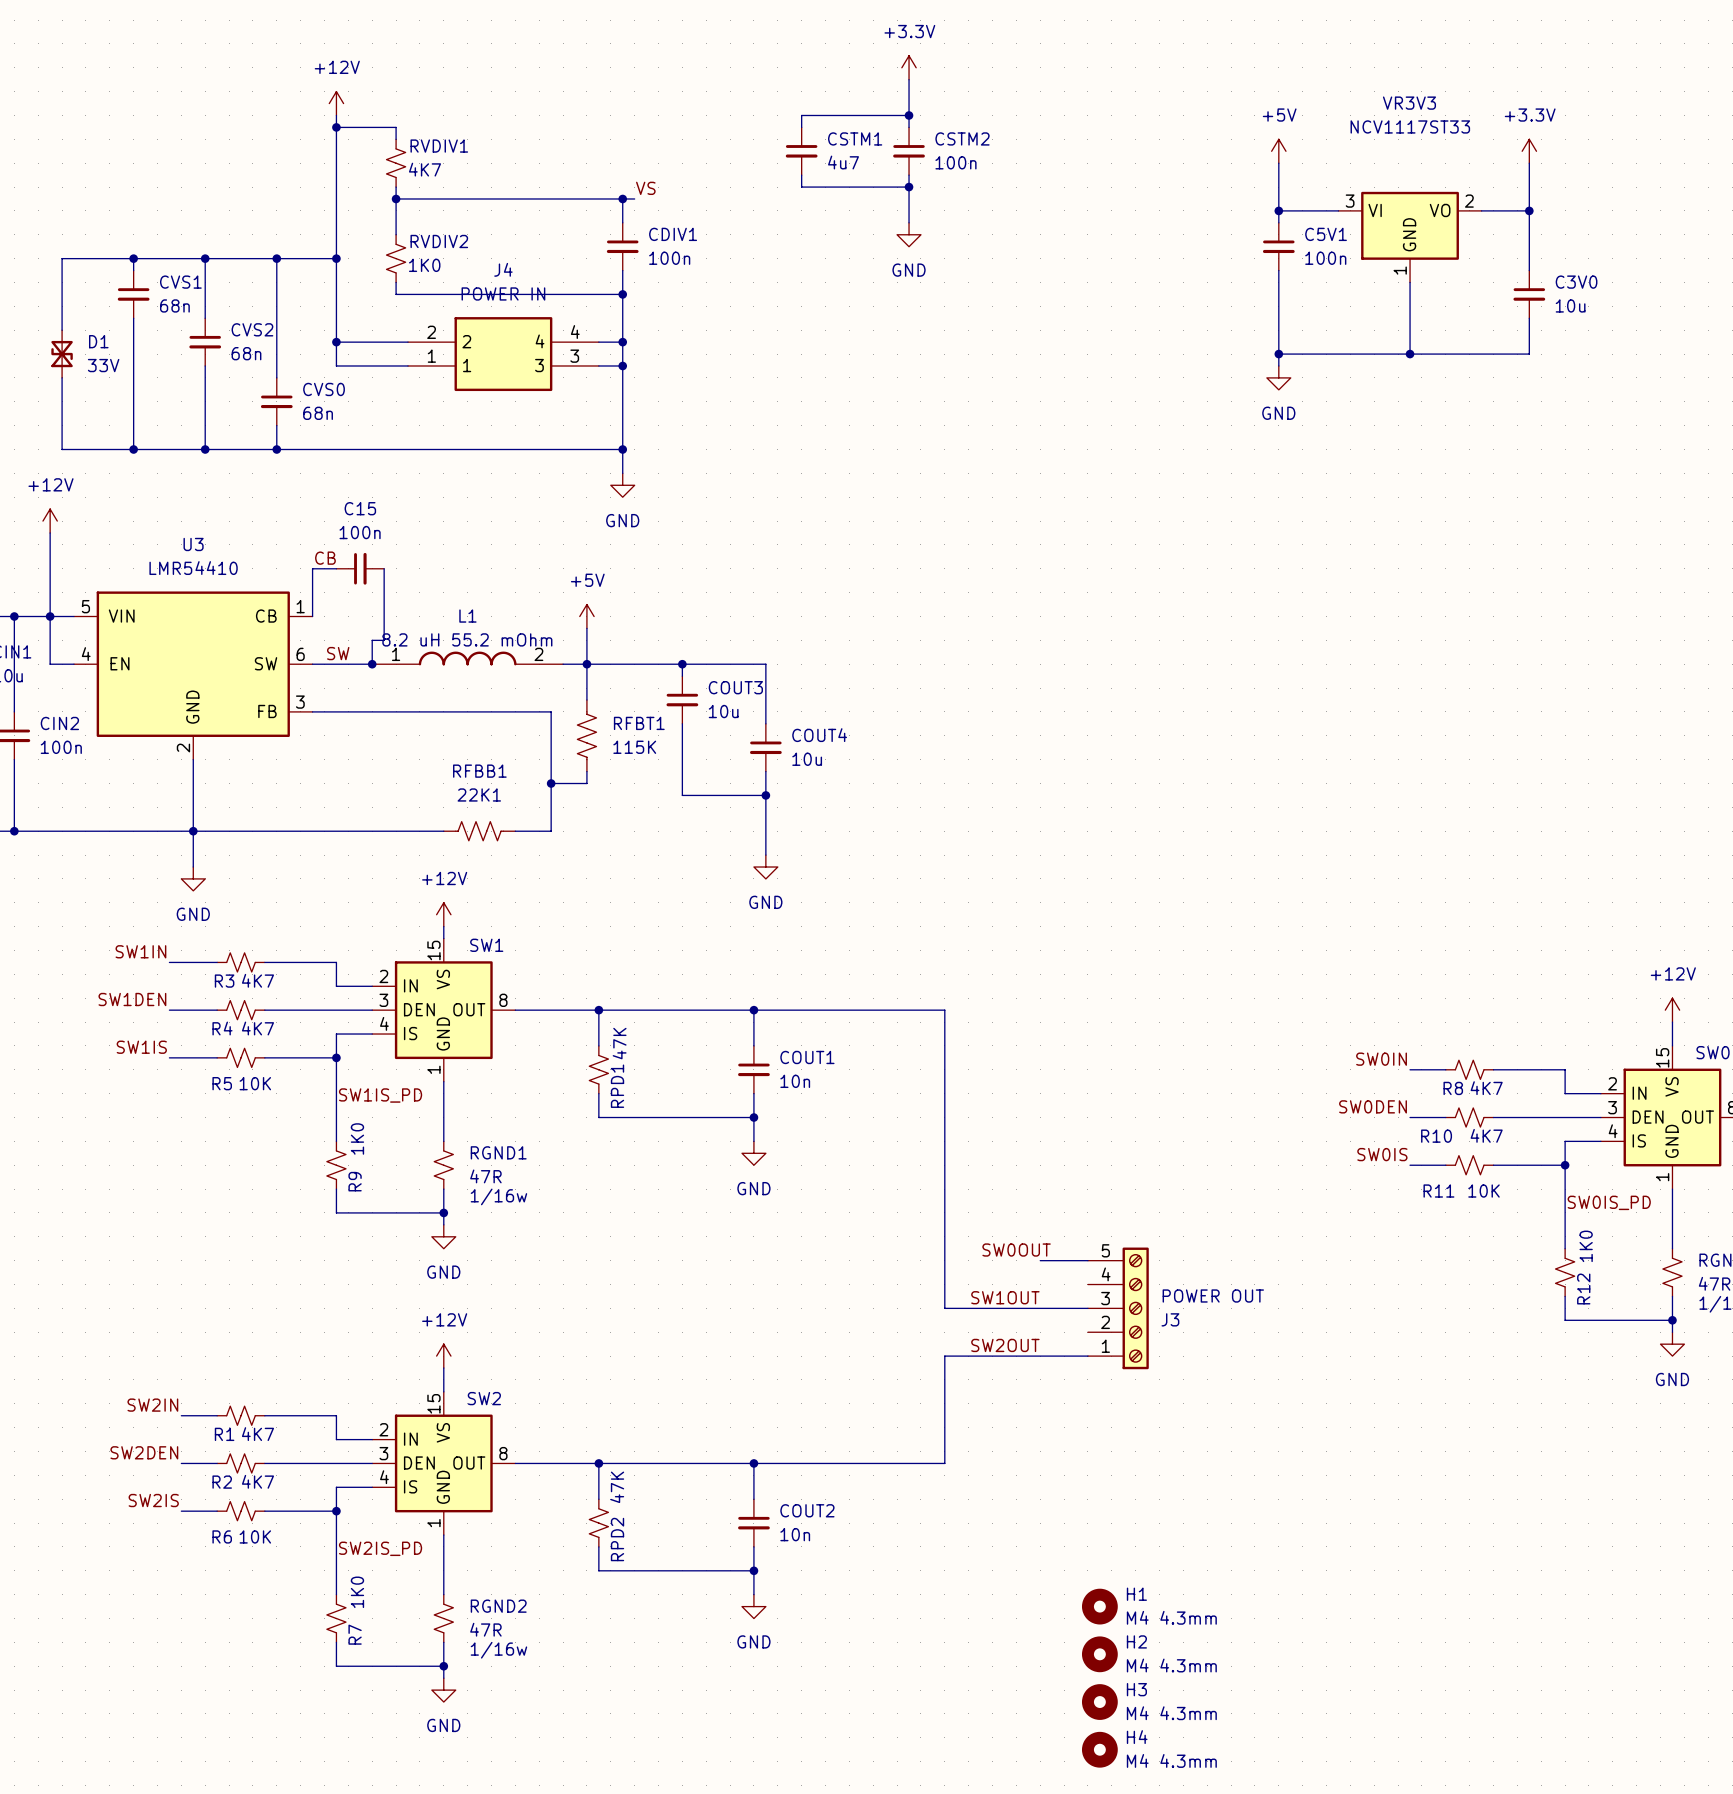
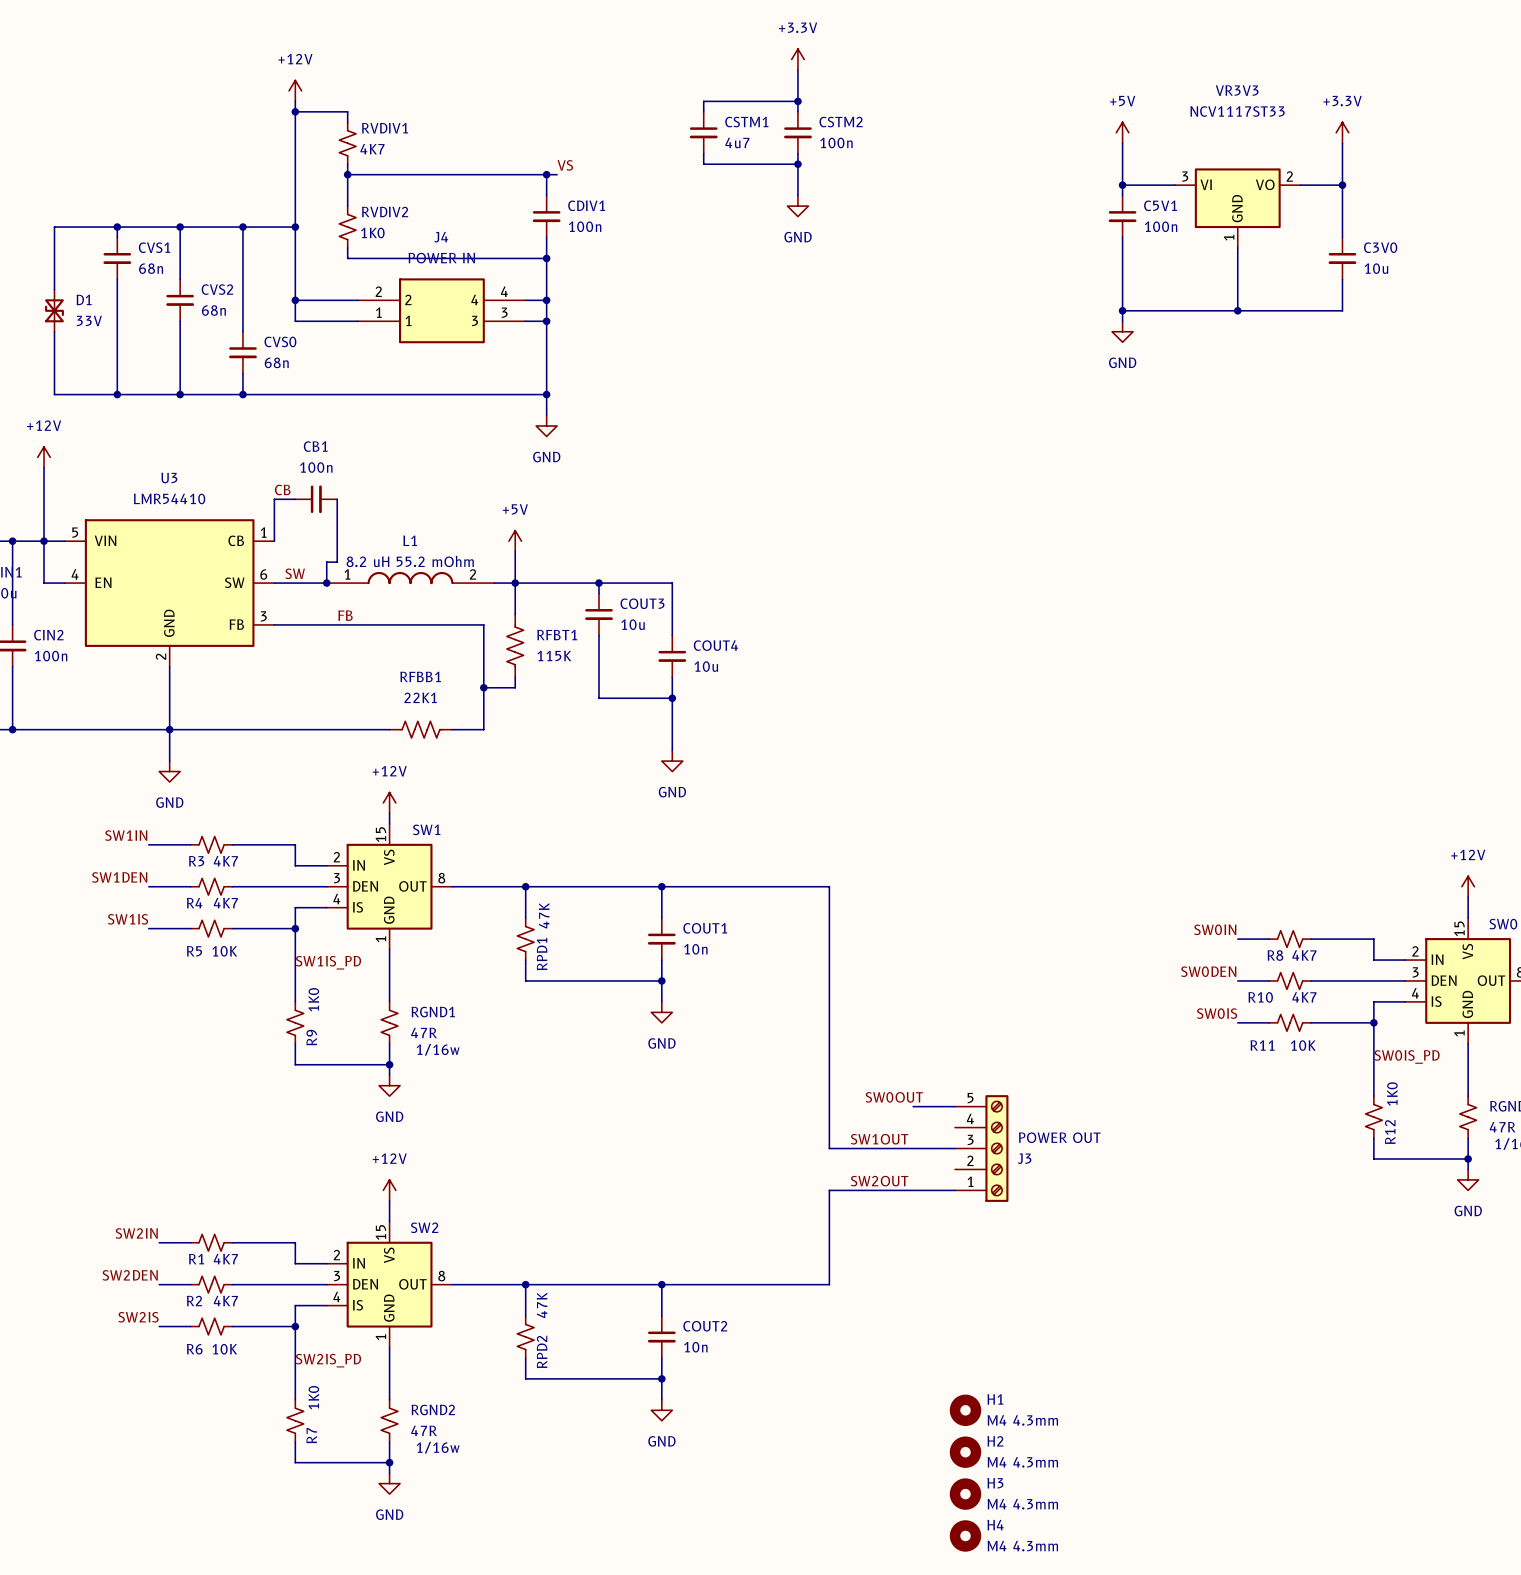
C15 name: C15 (360, 508) -> CB1 (315, 446)
label: none -> FB (345, 615)

